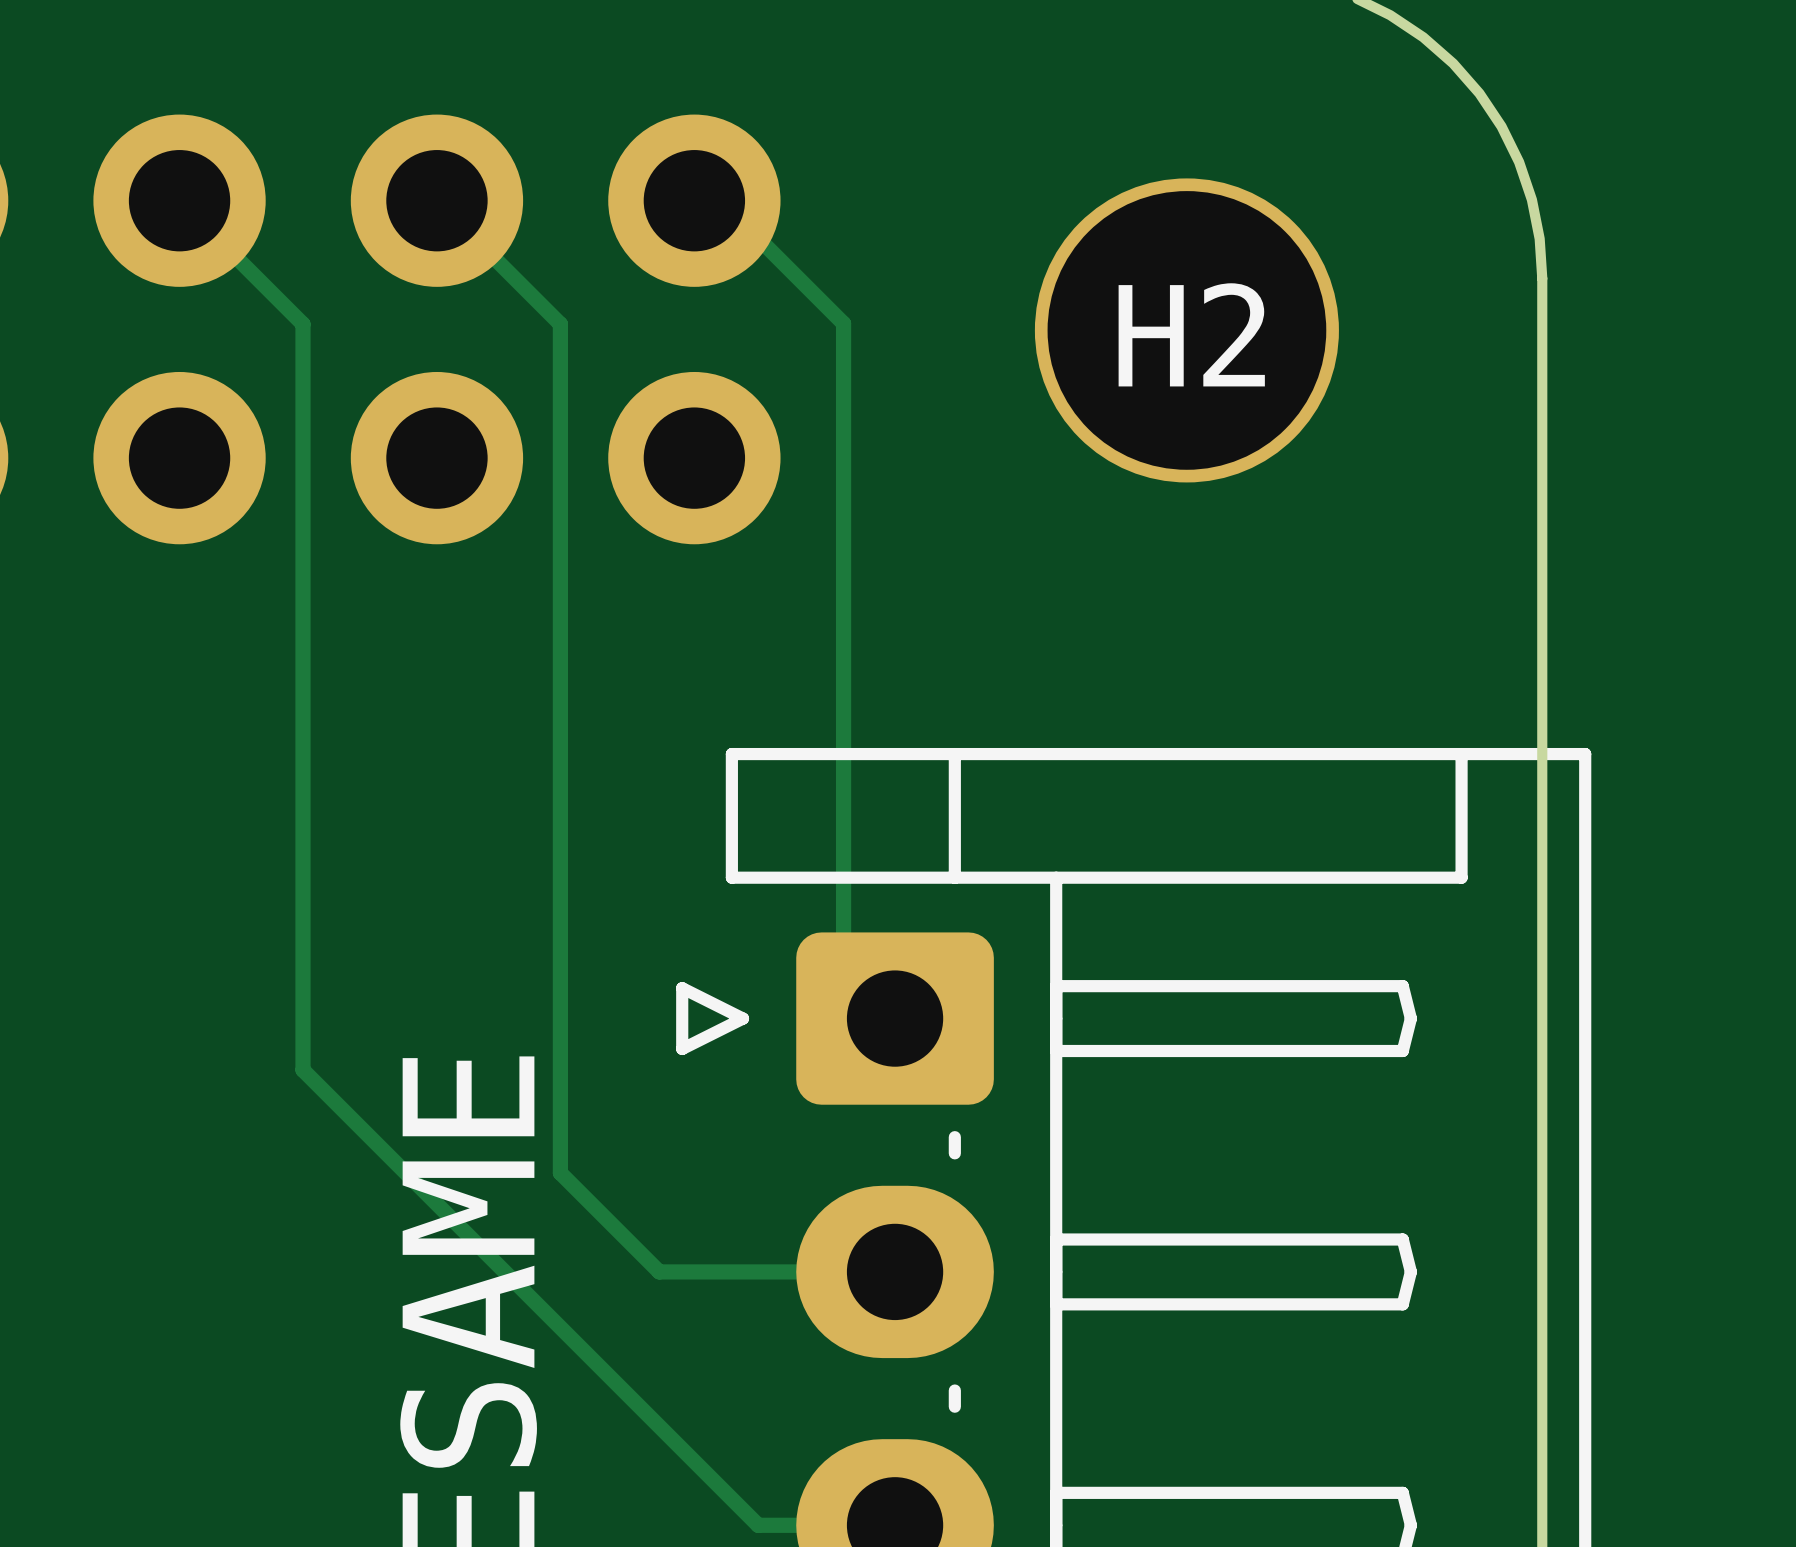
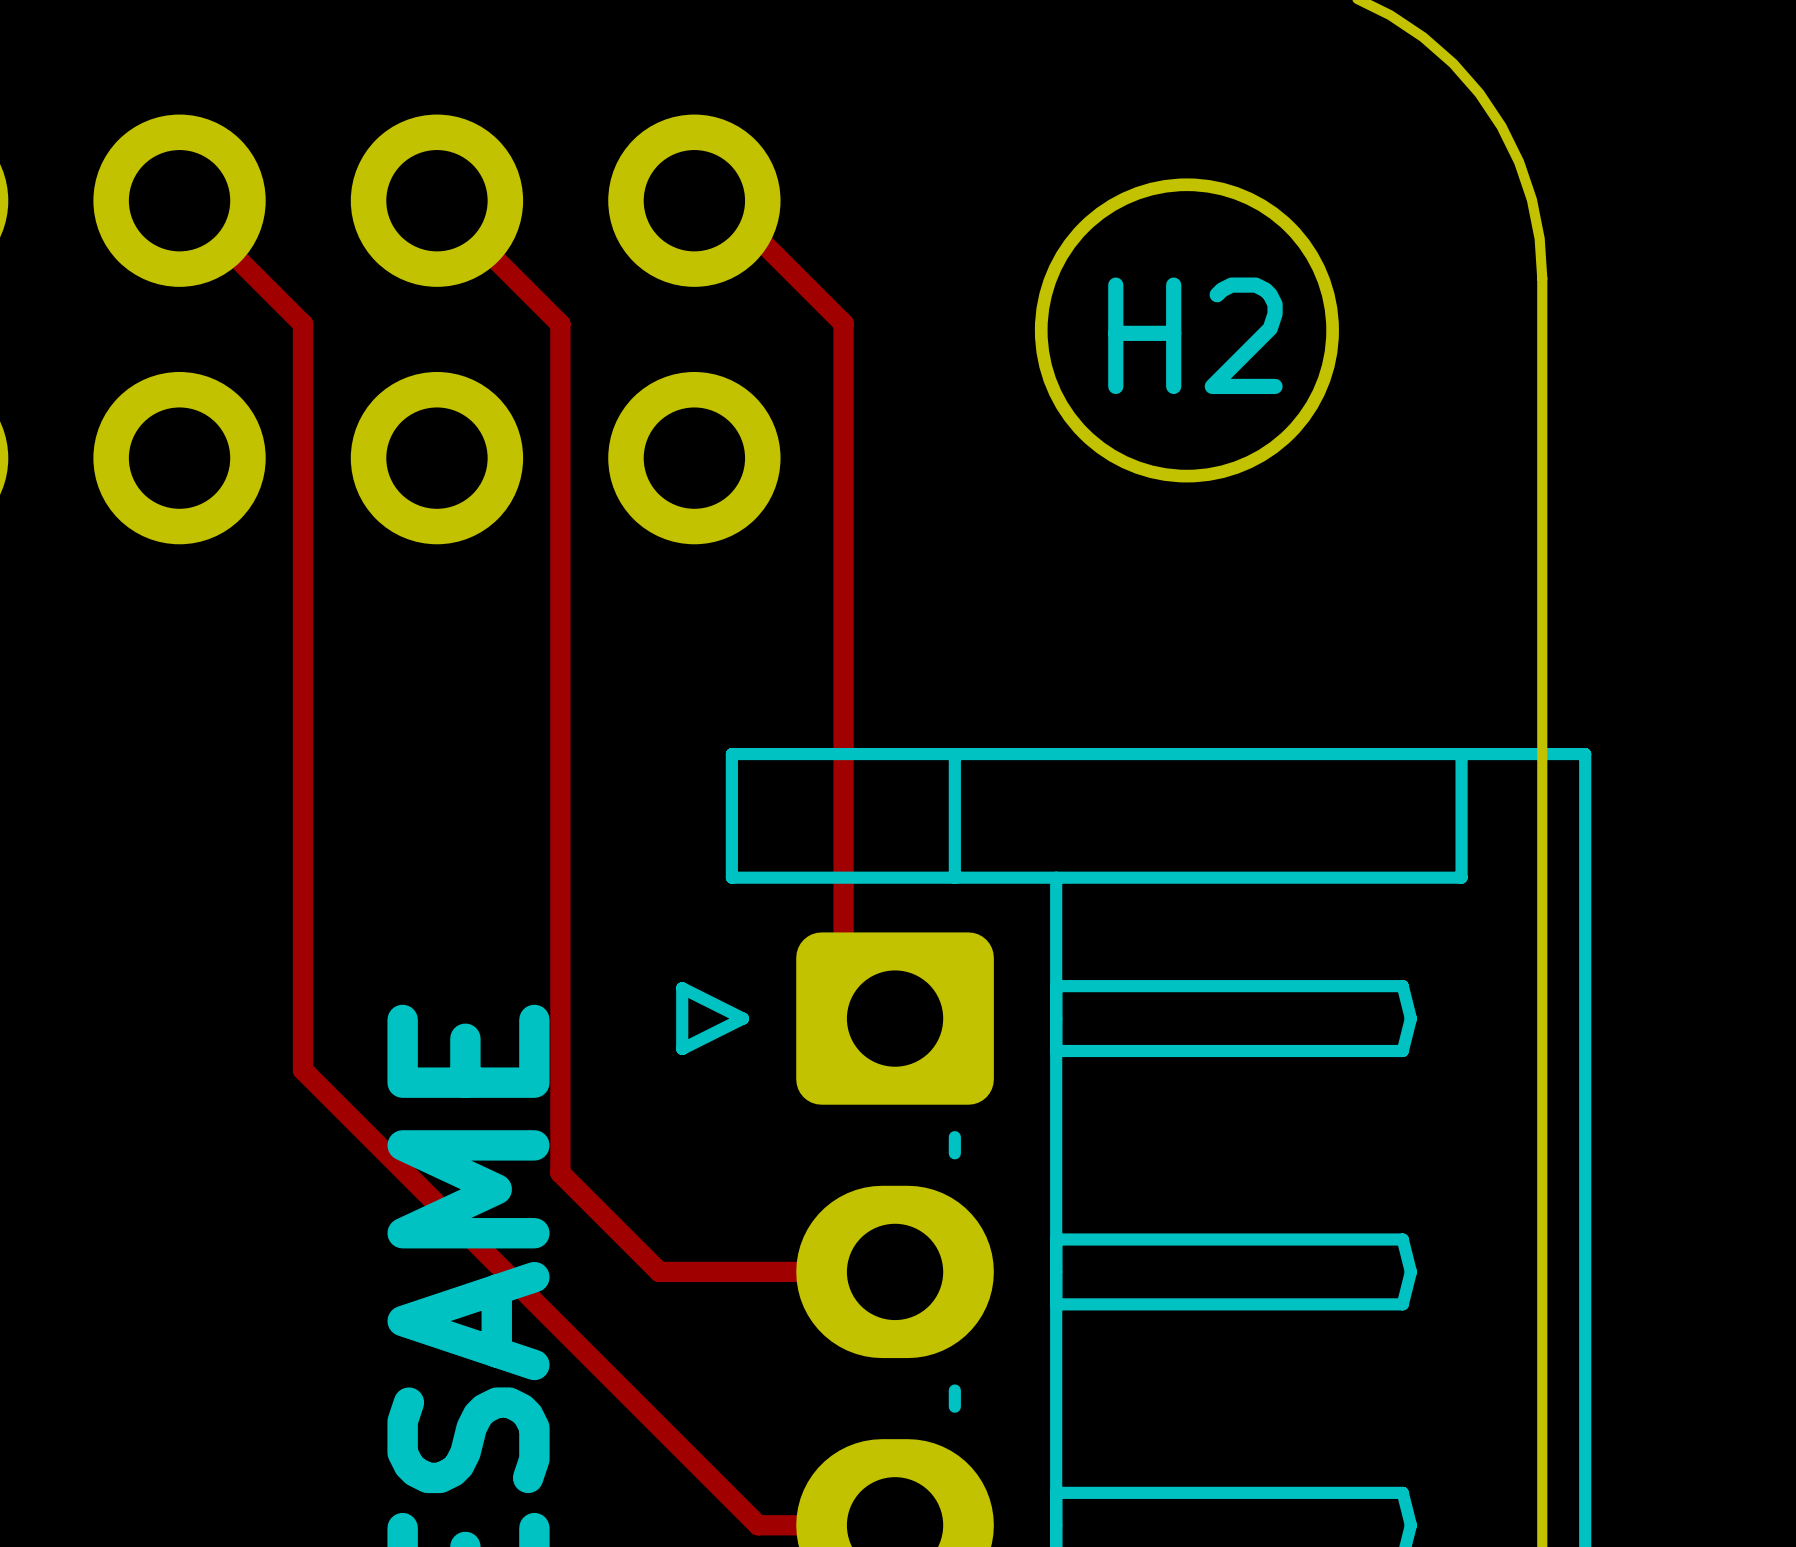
track width: thin (179, 200) (302, 324) (302, 1070) (758, 1525) (895, 1525) -> thick (179, 200) (302, 324) (302, 1070) (758, 1525) (895, 1525)
track width: thin (436, 200) (560, 324) (560, 1173) (659, 1271) (895, 1271) -> thick (436, 200) (560, 324) (560, 1173) (659, 1271) (895, 1271)
track width: thin (694, 200) (720, 200) (843, 323) (843, 967) (895, 1018) -> thick (694, 200) (720, 200) (843, 323) (843, 967) (895, 1018)

